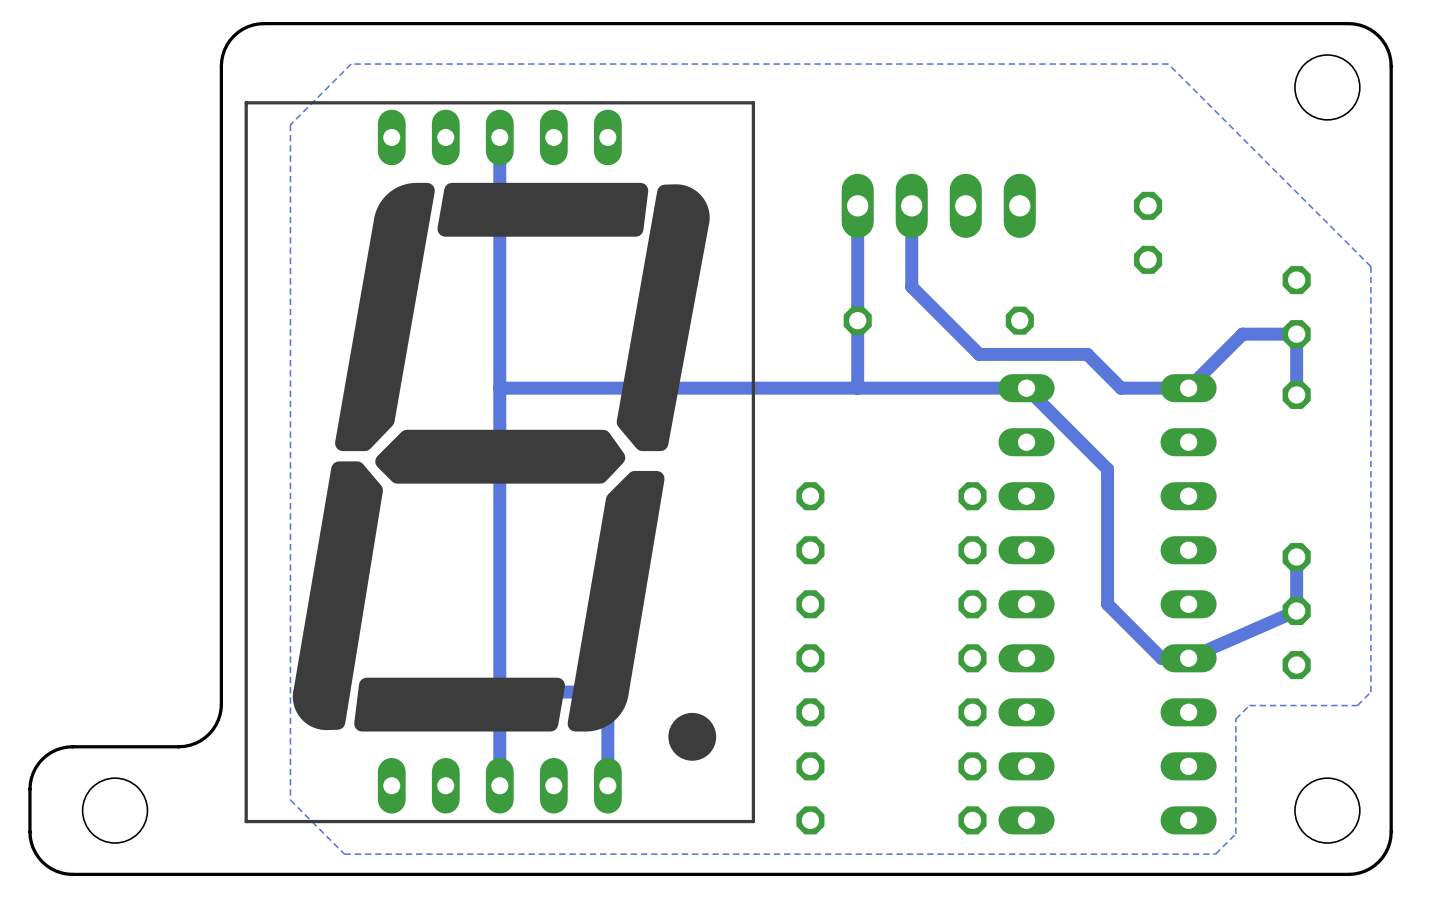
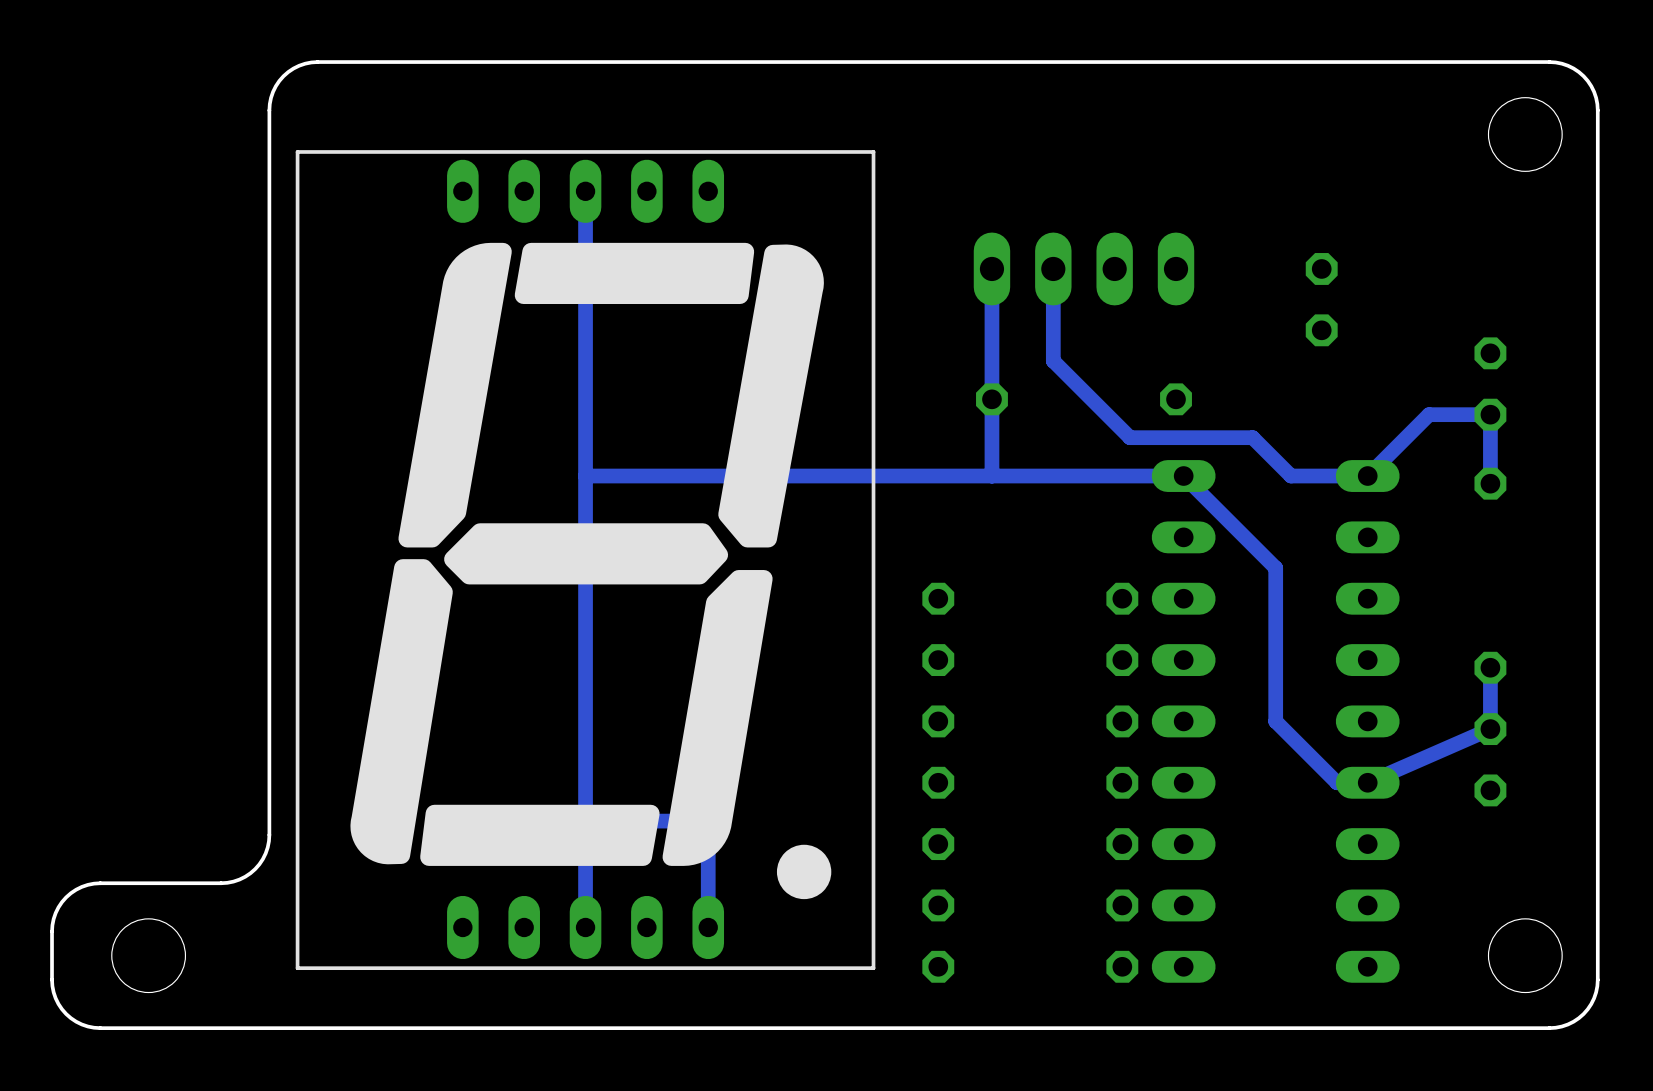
zone outline: (1168, 64) (1370, 266) (1370, 692) (1357, 705) (1249, 705) (1235, 719) (1235, 833) (1215, 854) (344, 854) (290, 800) (290, 124) (351, 64) (1168, 64) -> none

